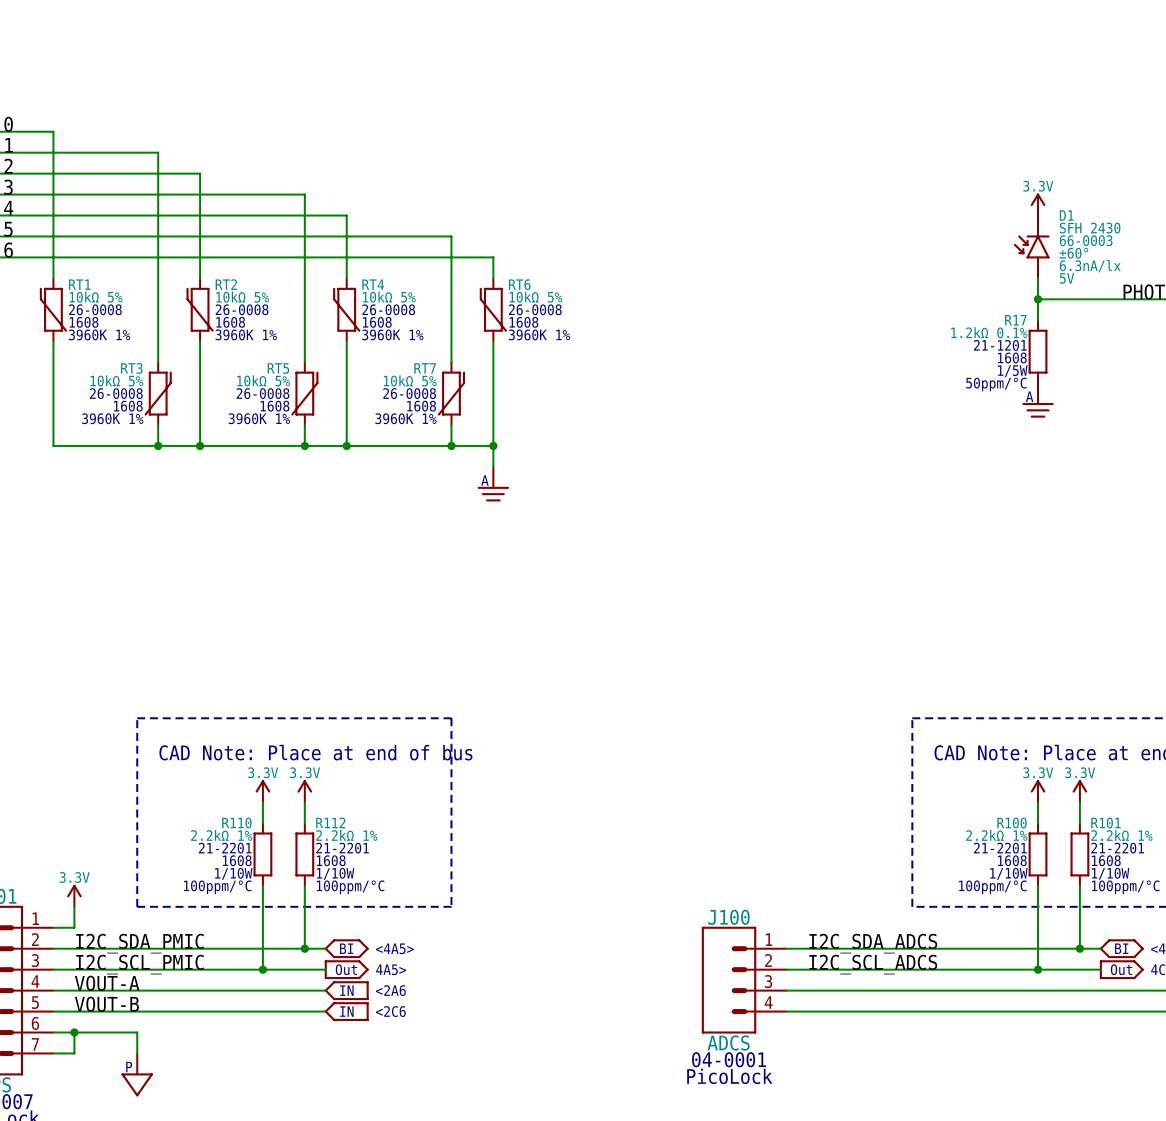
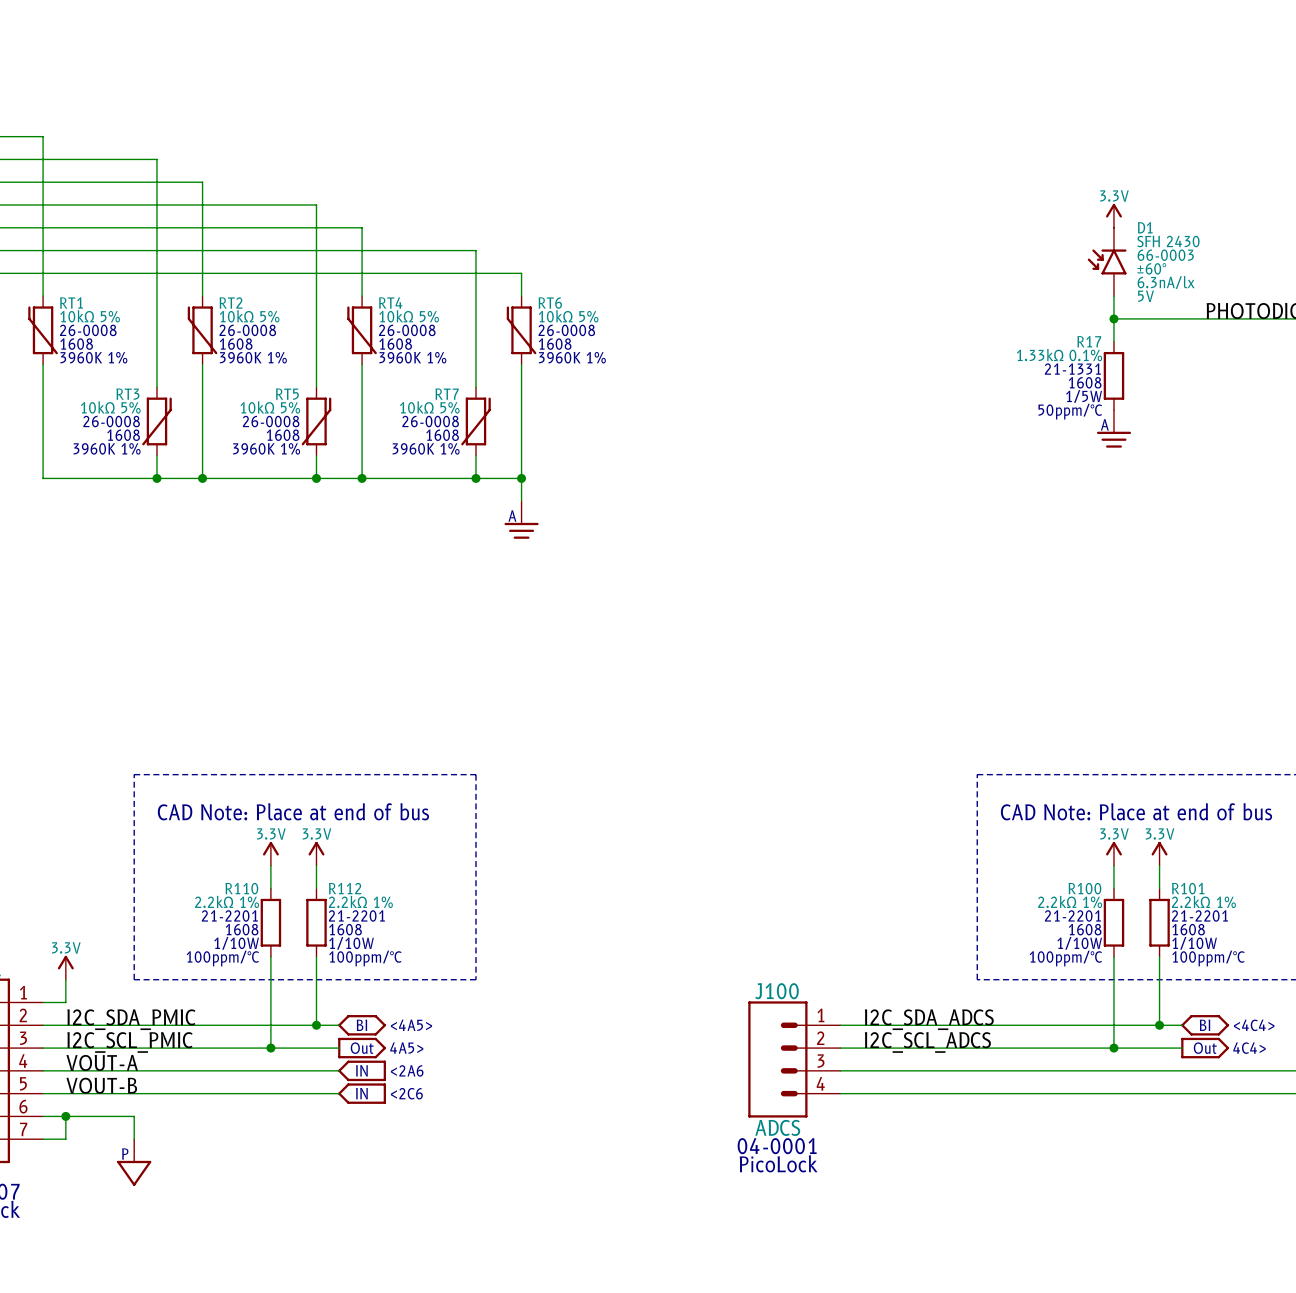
R17 value: 1.2kΩ 0.1% (989, 332) -> 1.33kΩ 0.1% (1059, 355)
R17 text: 21-1201 (1000, 345) -> 21-1331 (1072, 369)

